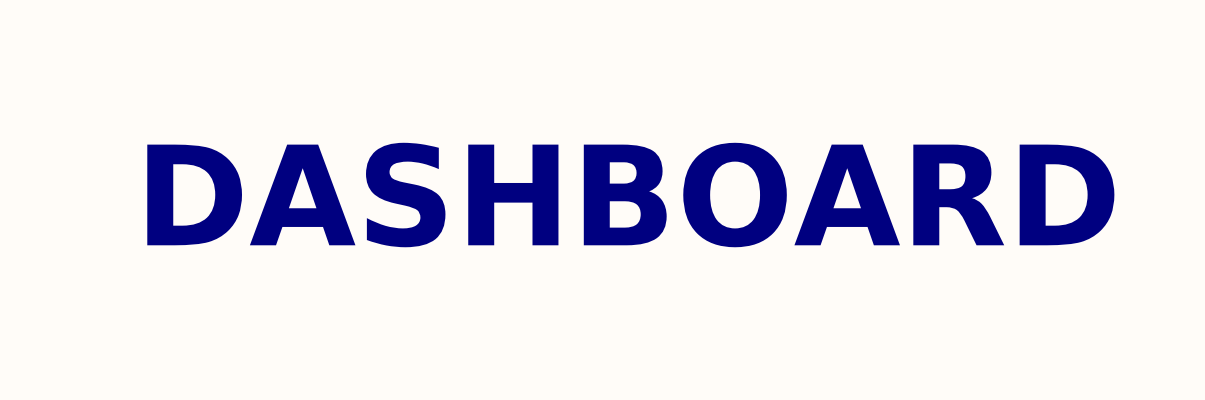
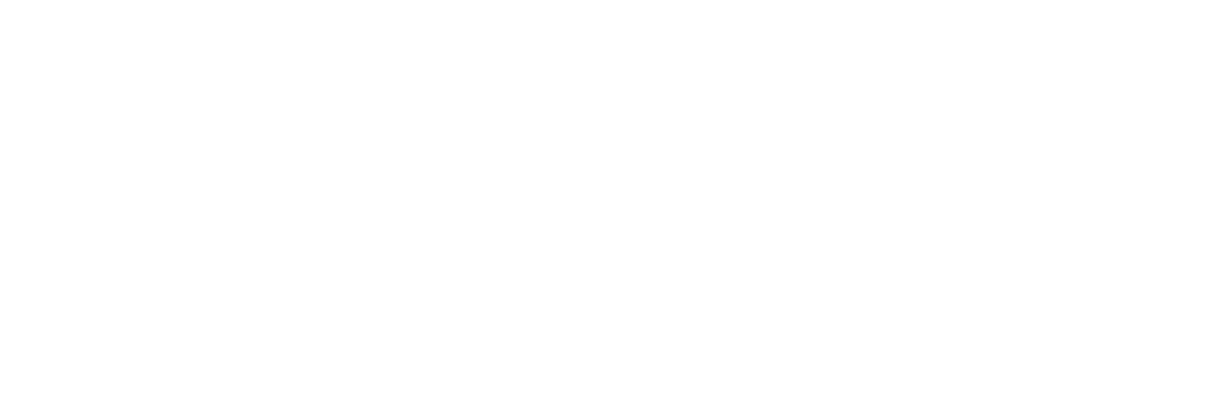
text: DASHBOARD (630, 195) -> none

